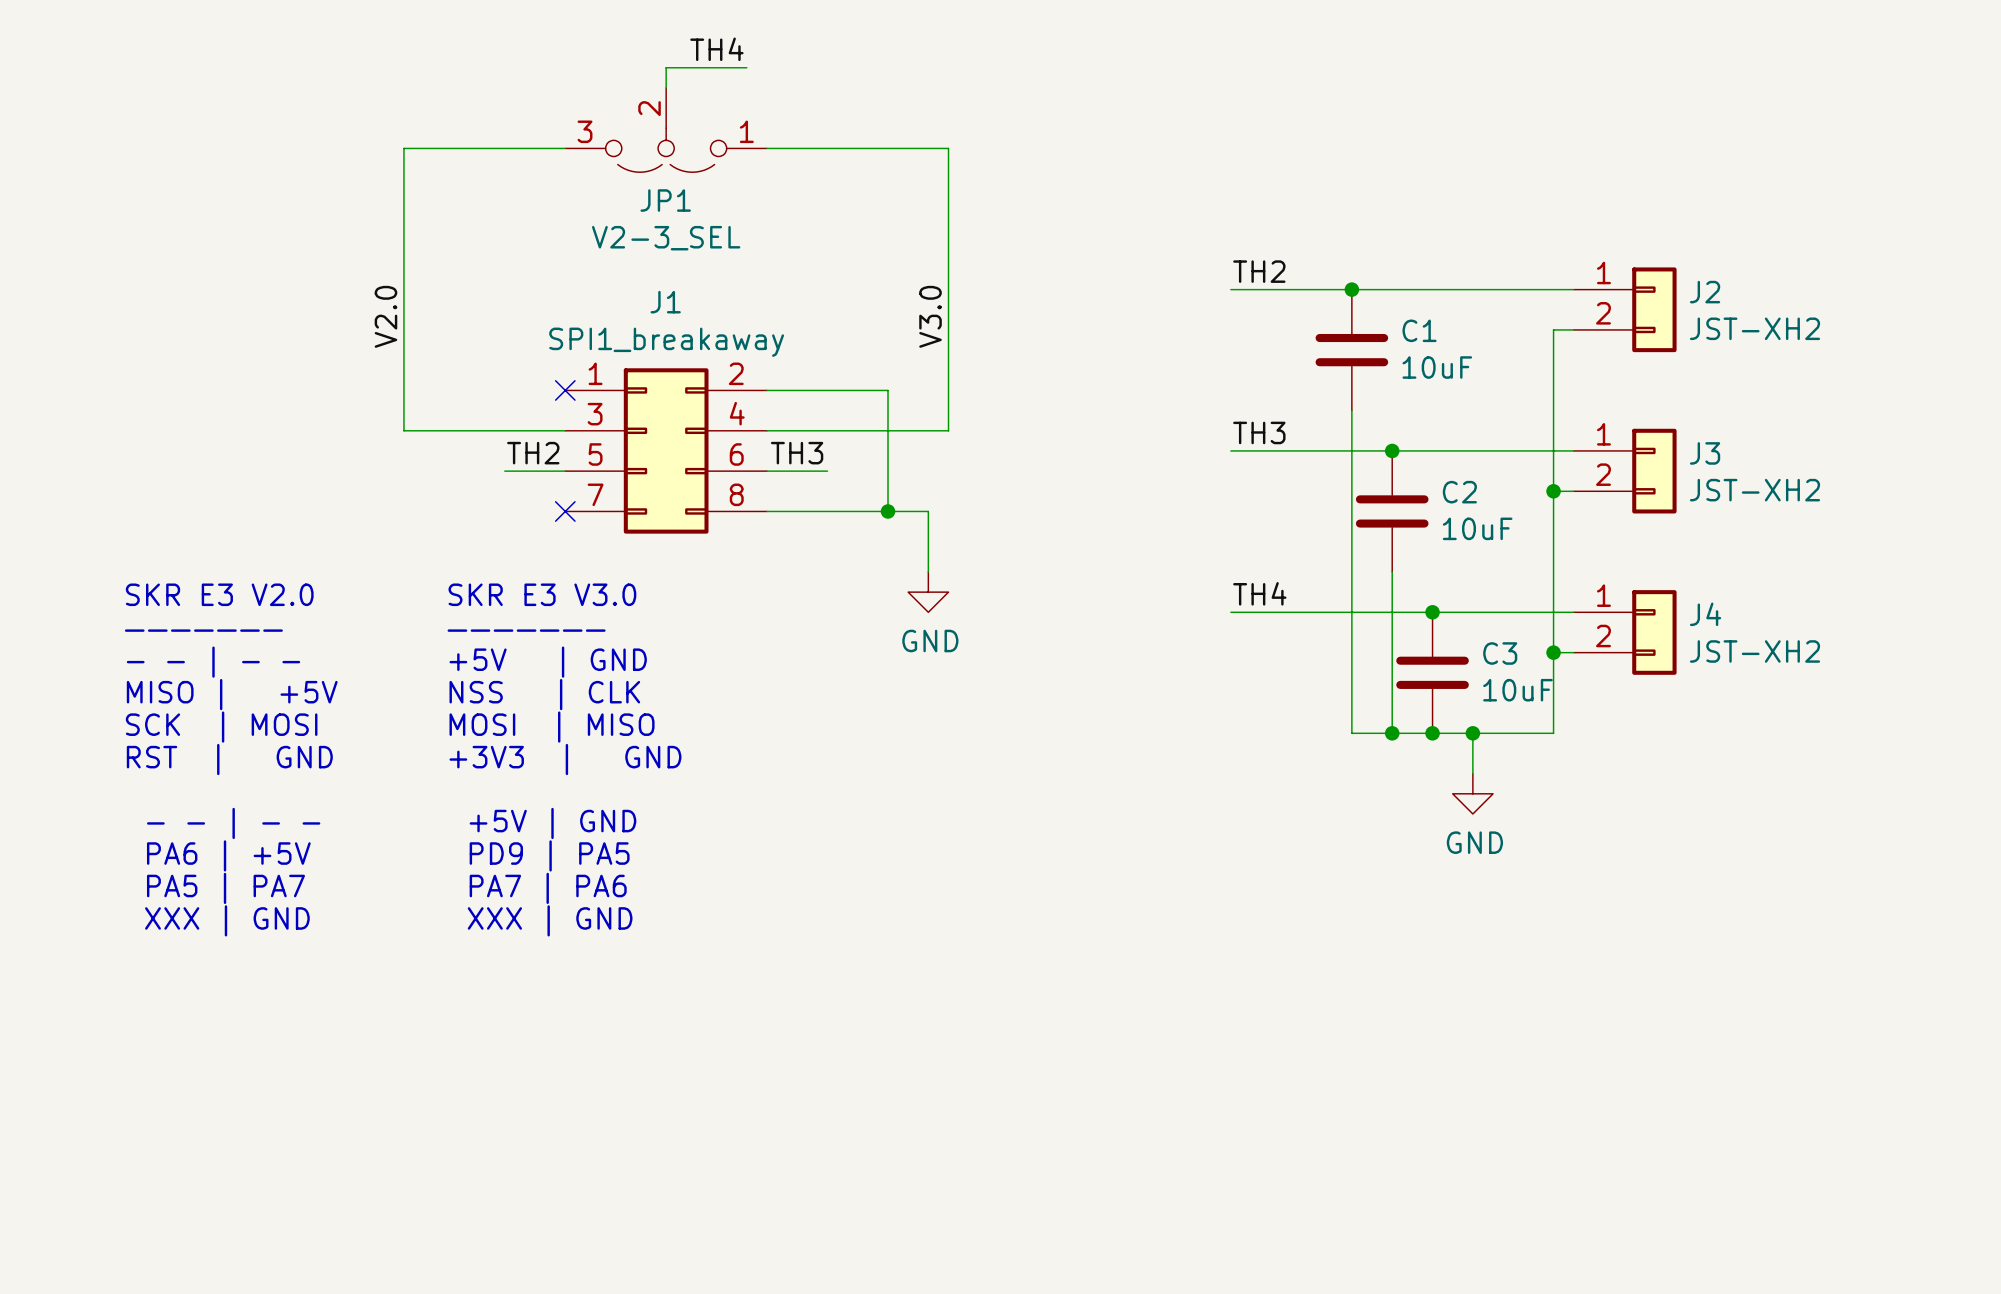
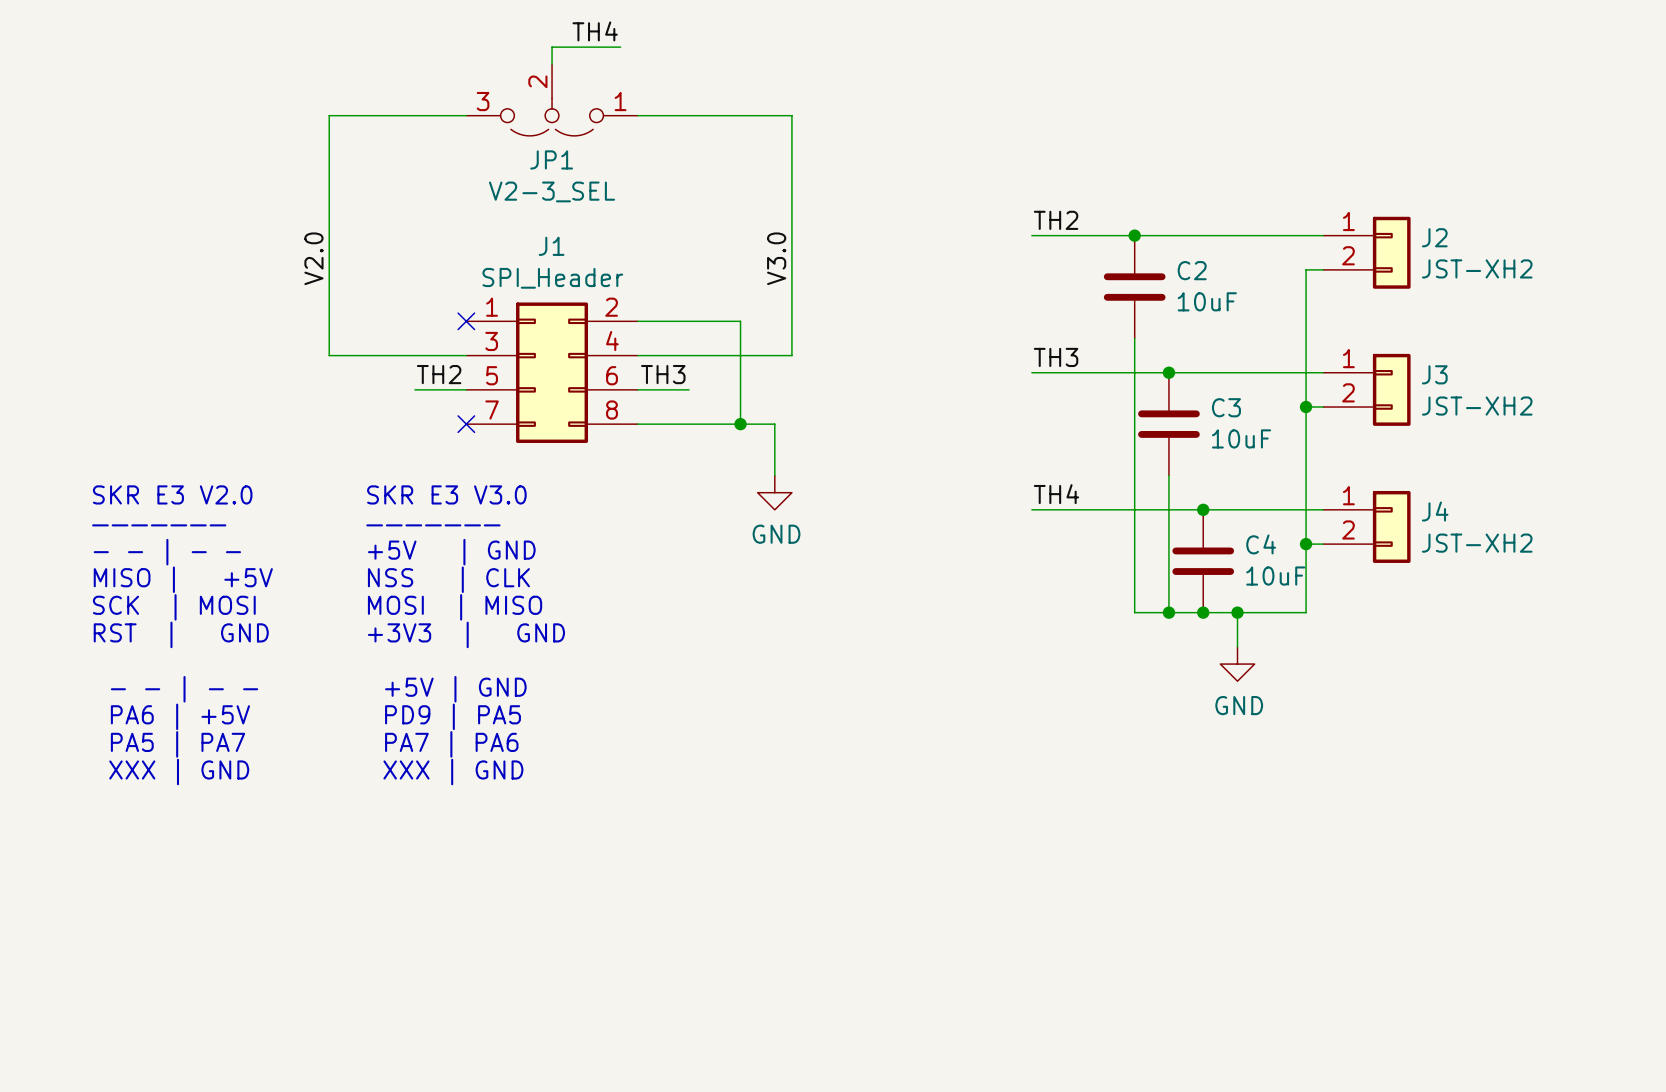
C1 name: C1 (1419, 330) -> C2 (1192, 270)
J1 value: SPI1_breakaway (666, 342) -> SPI_Header (552, 278)
C2 name: C2 (1459, 492) -> C3 (1226, 407)
C3 name: C3 (1500, 653) -> C4 (1261, 544)

